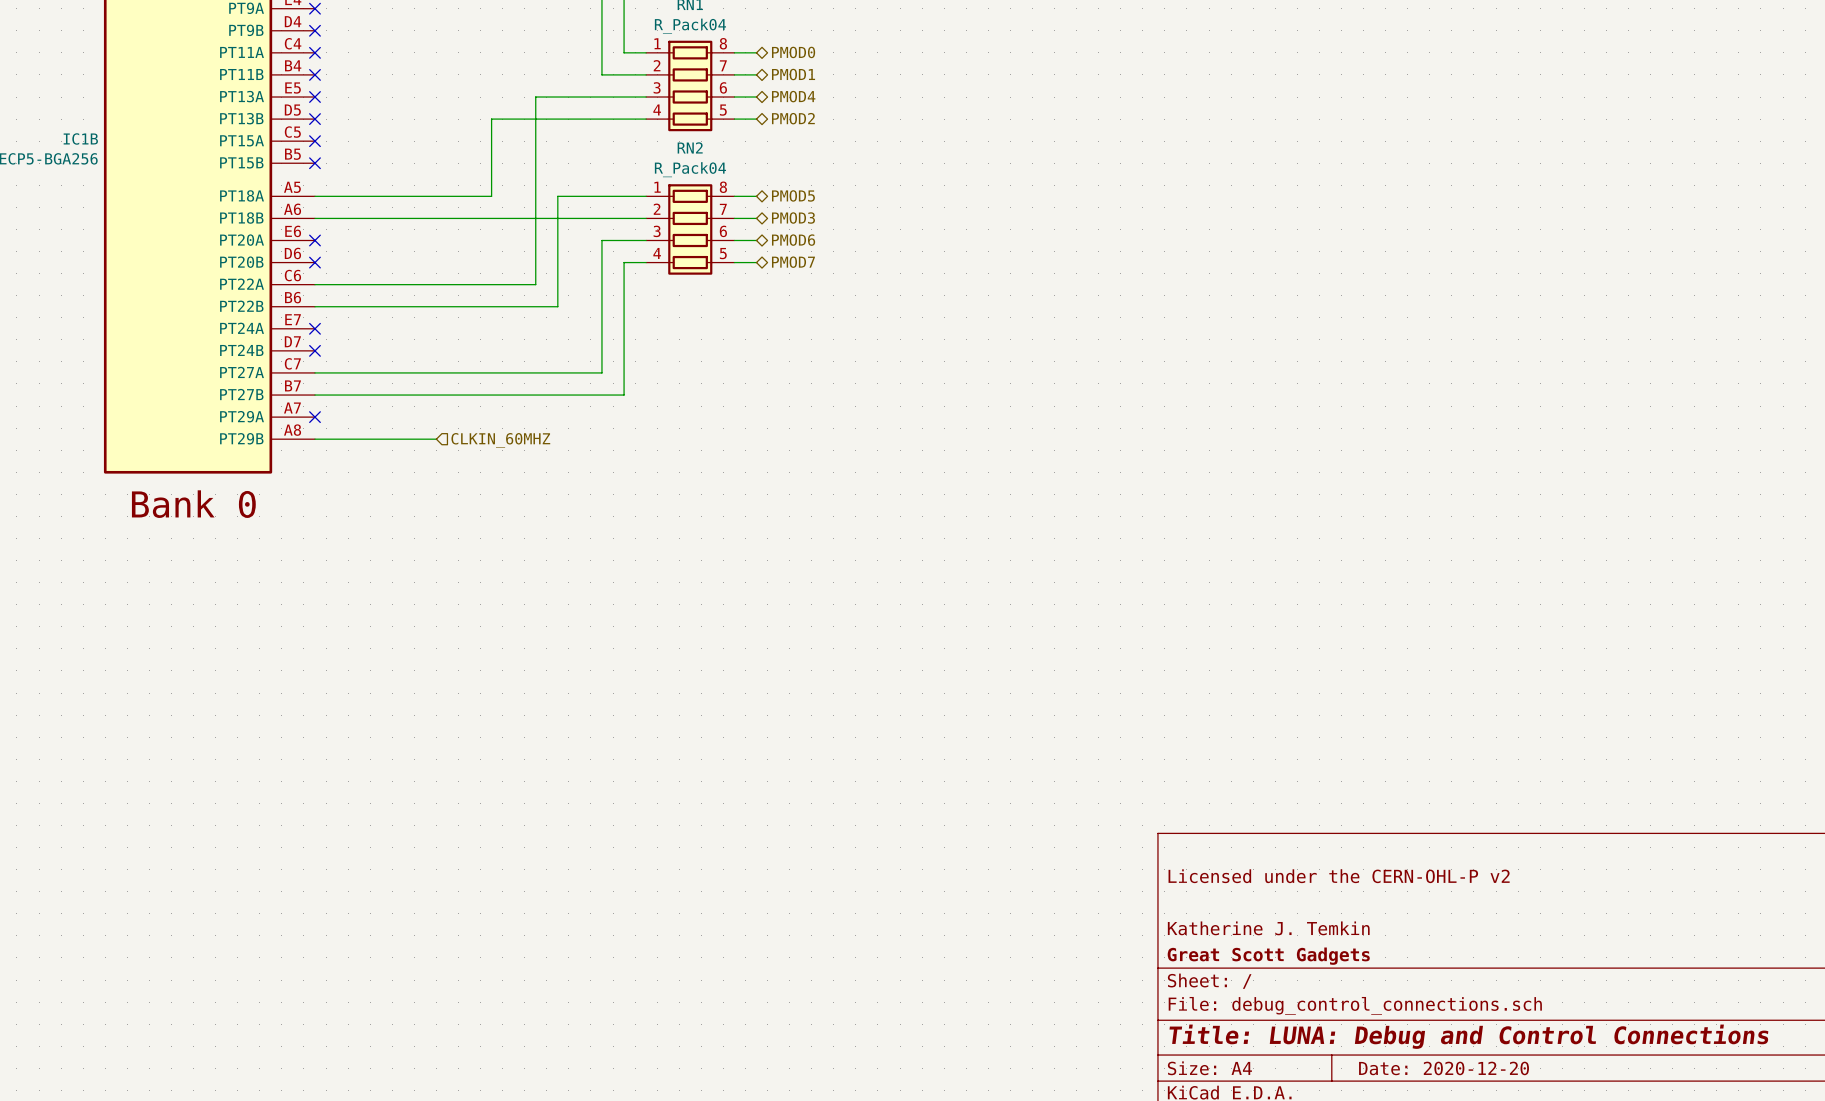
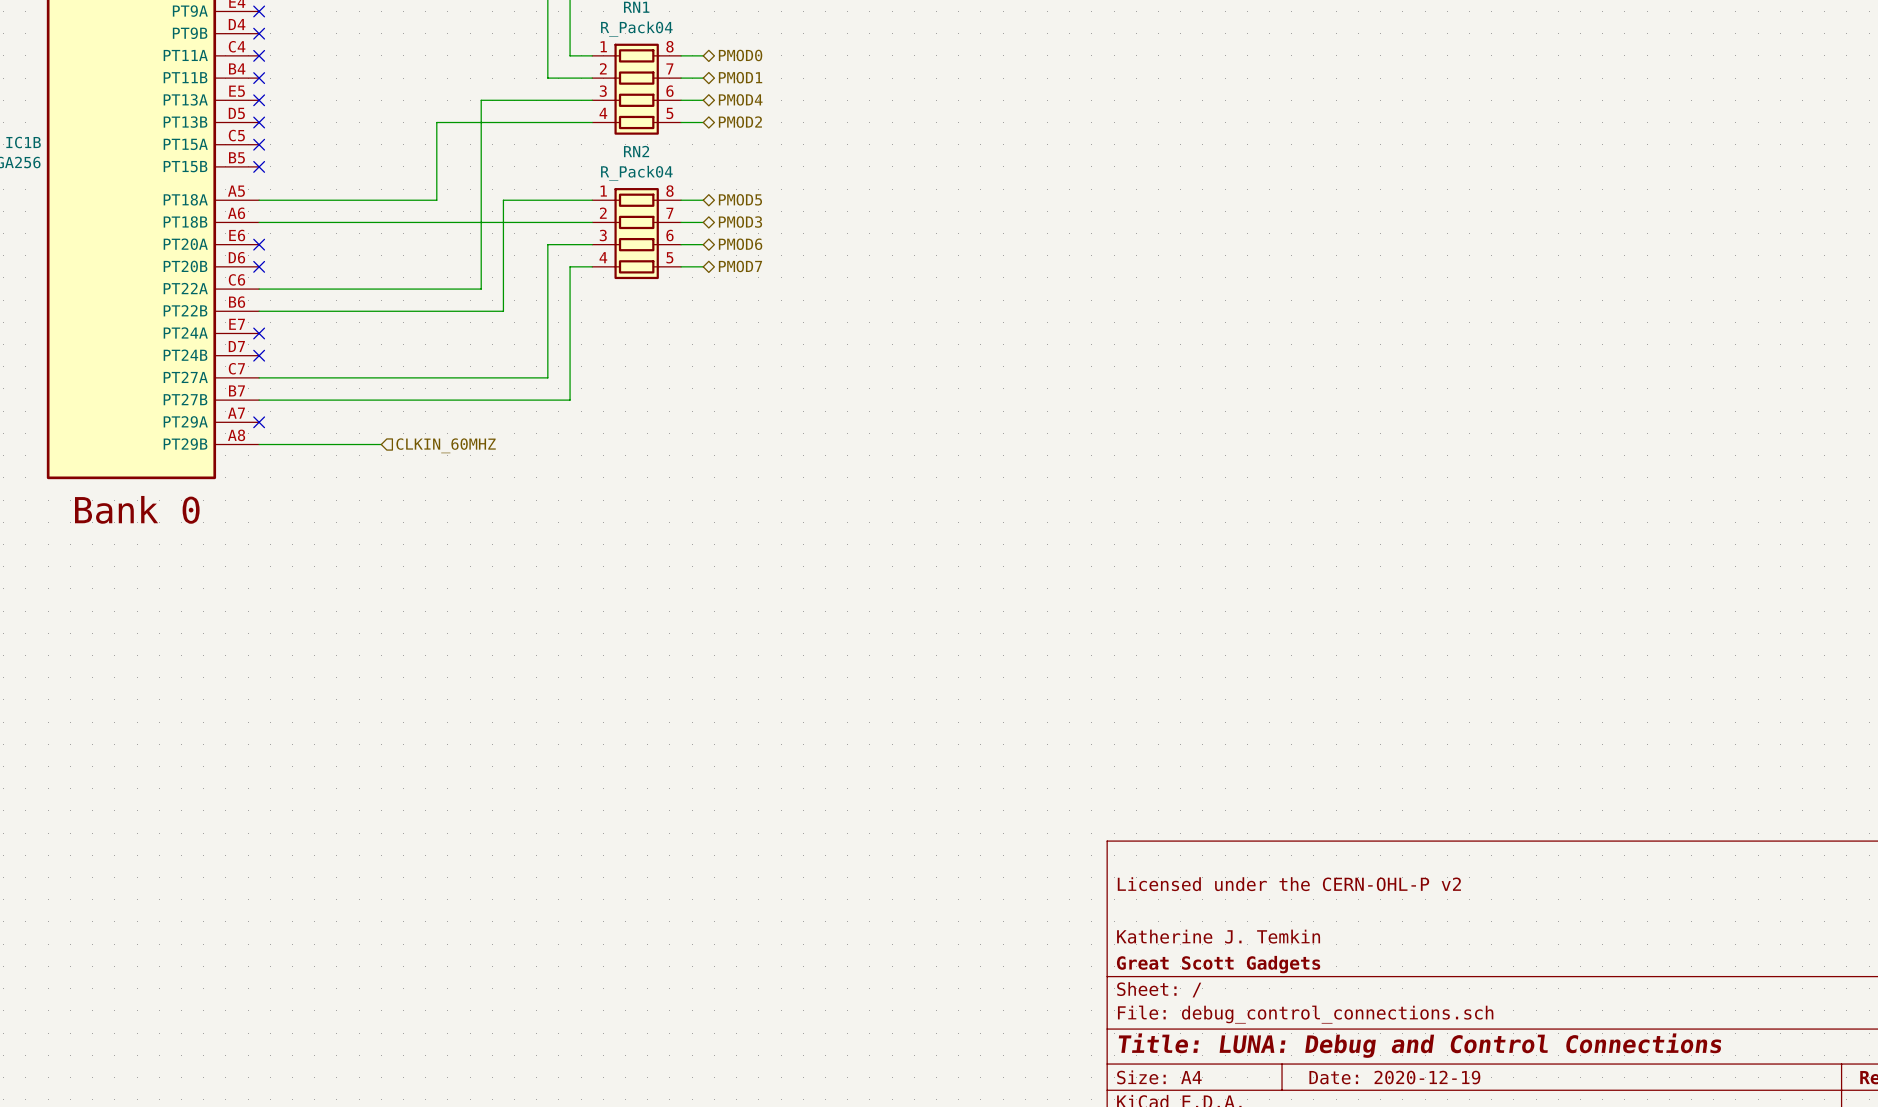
title block: Date: 2020-12-20 (1444, 1068) -> Date: 2020-12-19 (1394, 1077)

